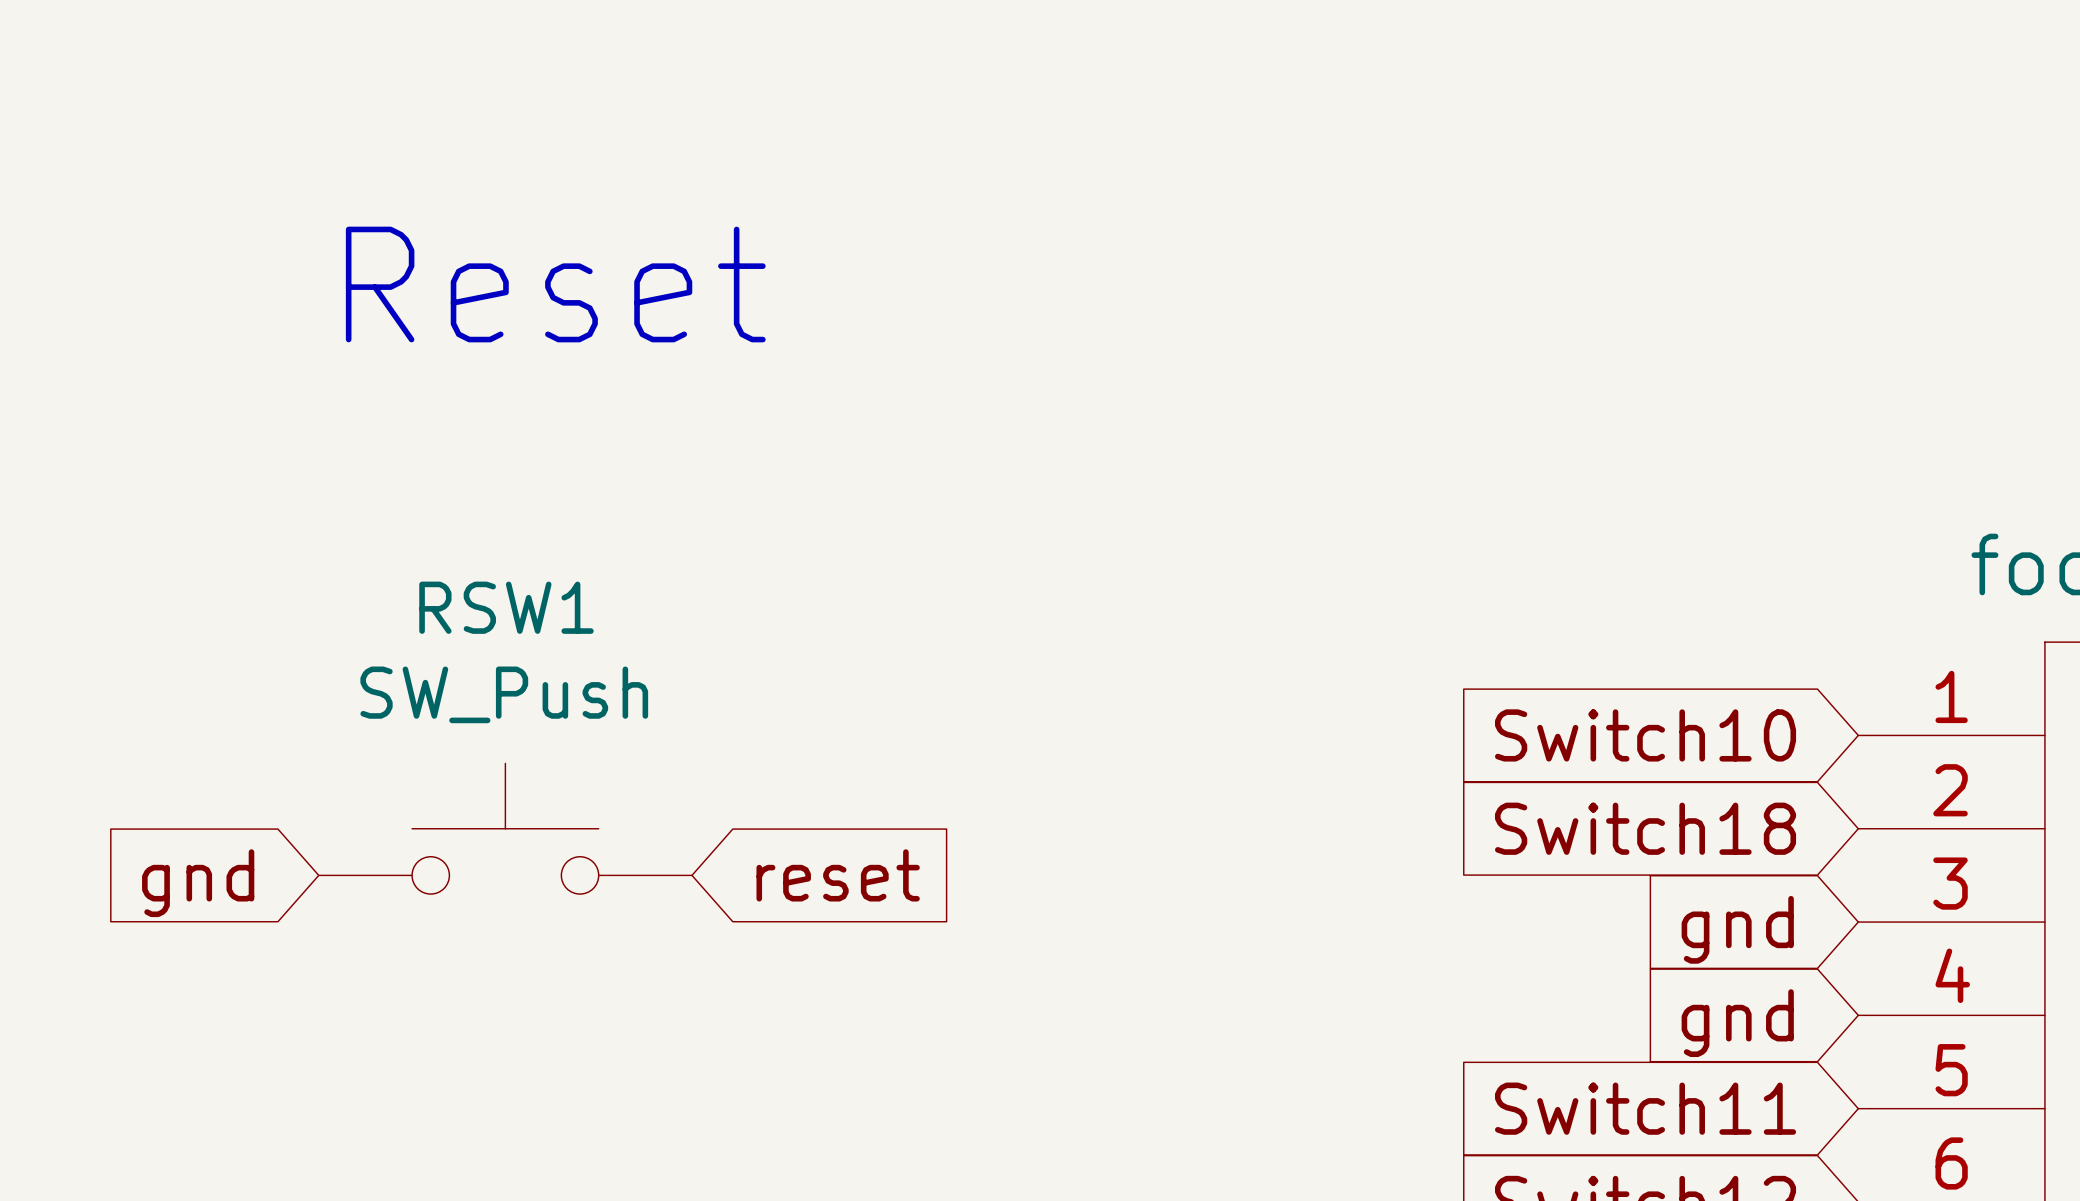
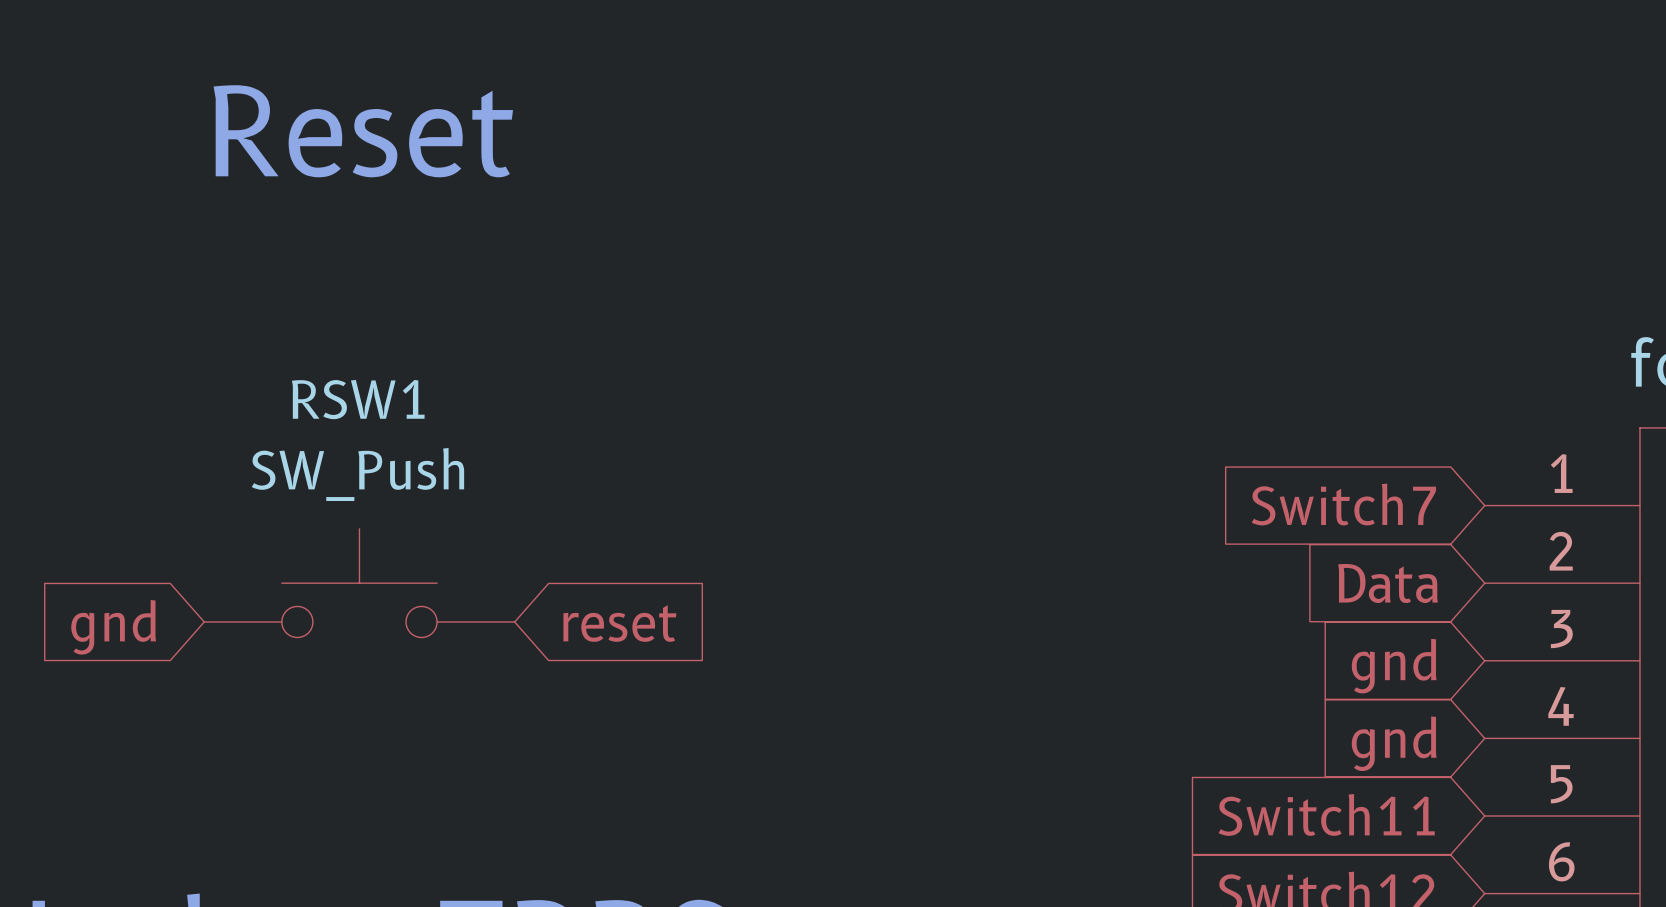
global label: Switch10 (1645, 735) -> Switch7 (1343, 504)
global label: Switch18 (1645, 828) -> Data (1388, 583)

